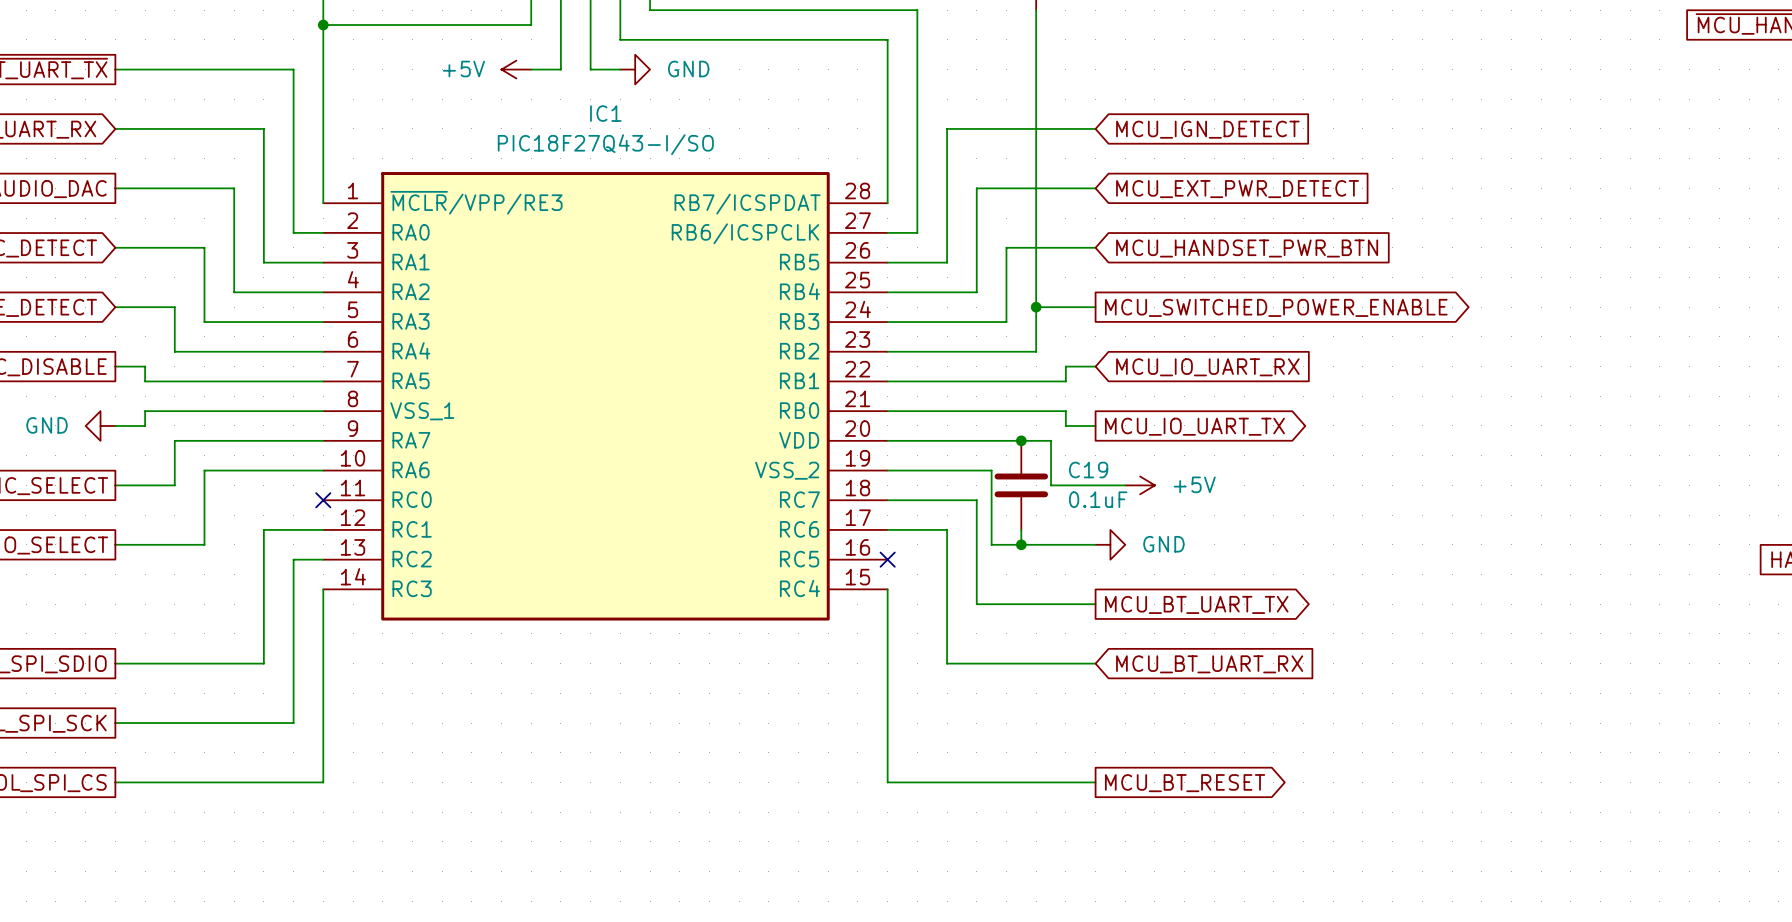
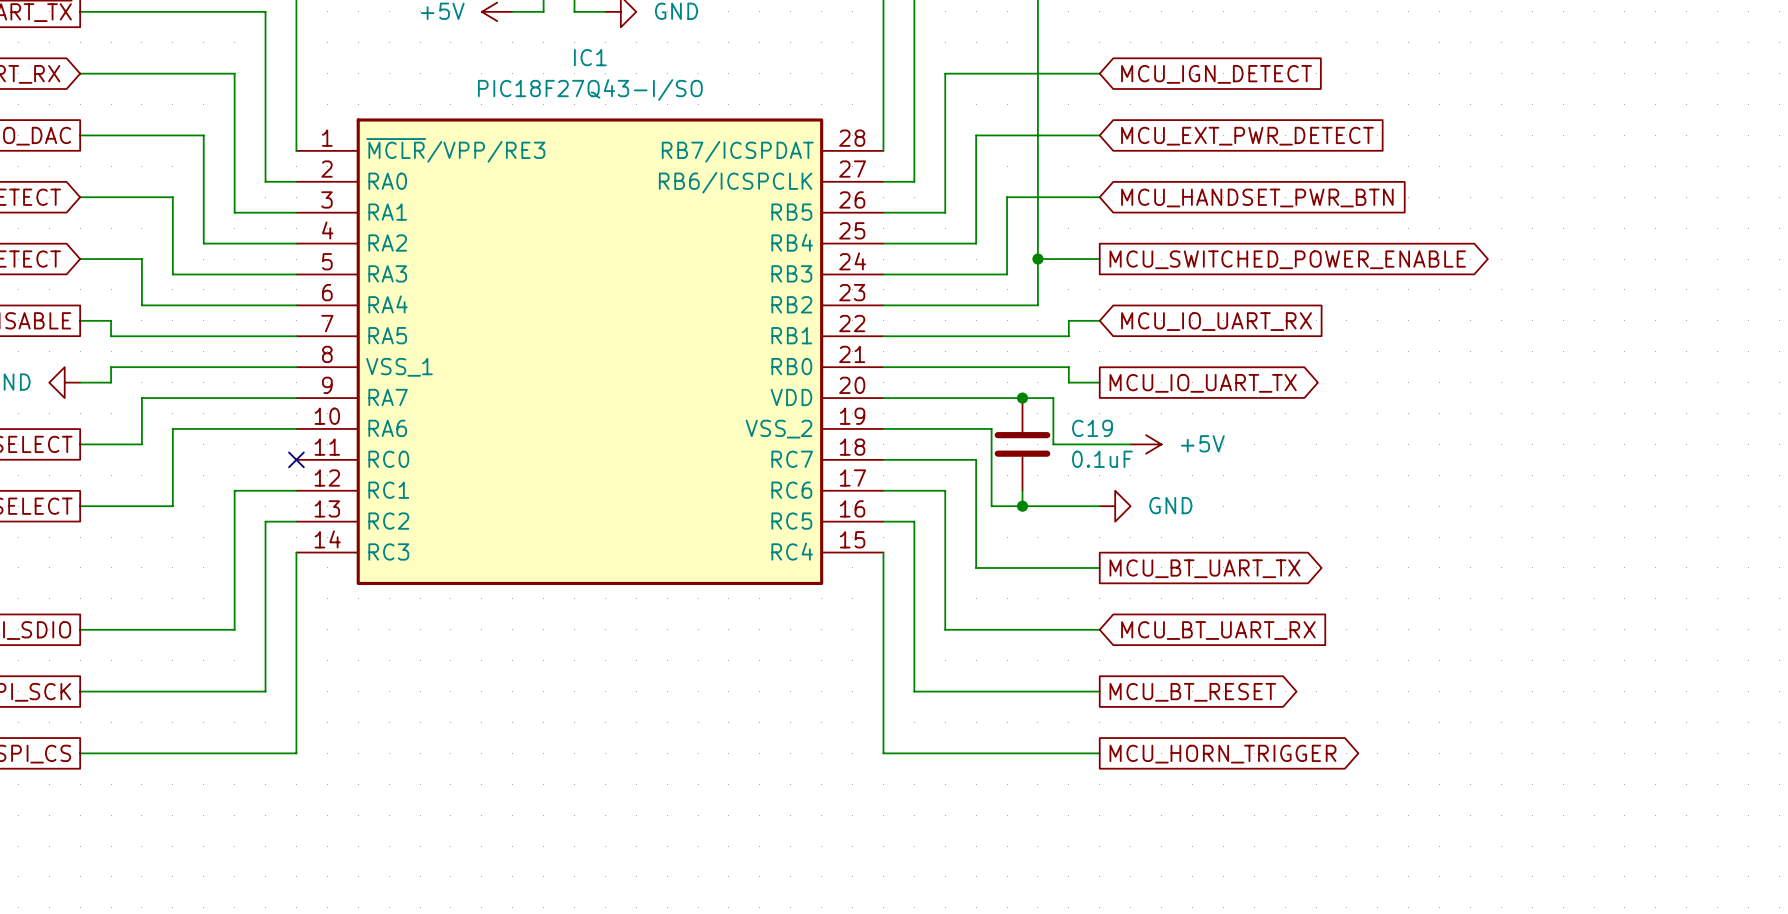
wire: none -> (883, 521) (914, 521) (914, 691) (1099, 691)
no-connect mark: (887, 559) -> none
global label: none -> MCU_BT_RESET (1192, 692)
global label: MCU_BT_RESET (1185, 783) -> MCU_HORN_TRIGGER (1222, 754)

